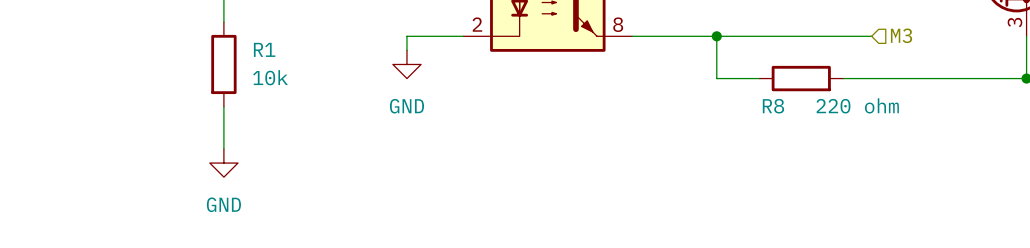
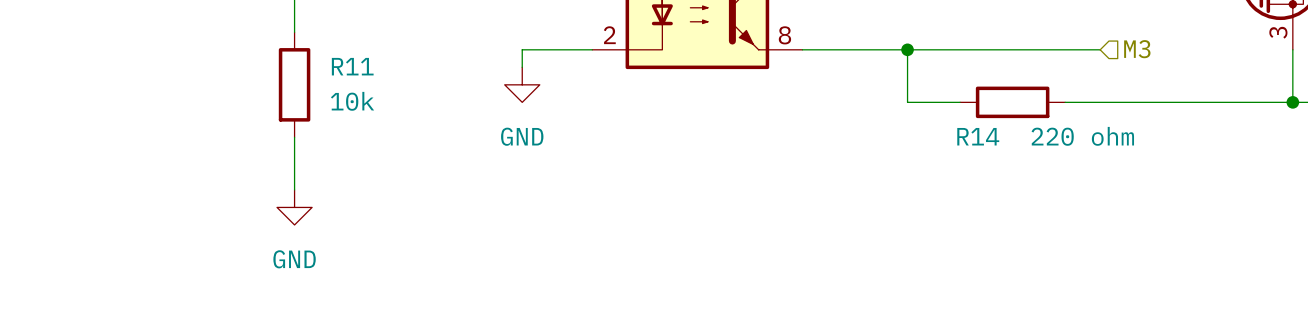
R1 name: R1 (264, 49) -> R11 (352, 66)
R8 name: R8 (773, 106) -> R14 (978, 136)

